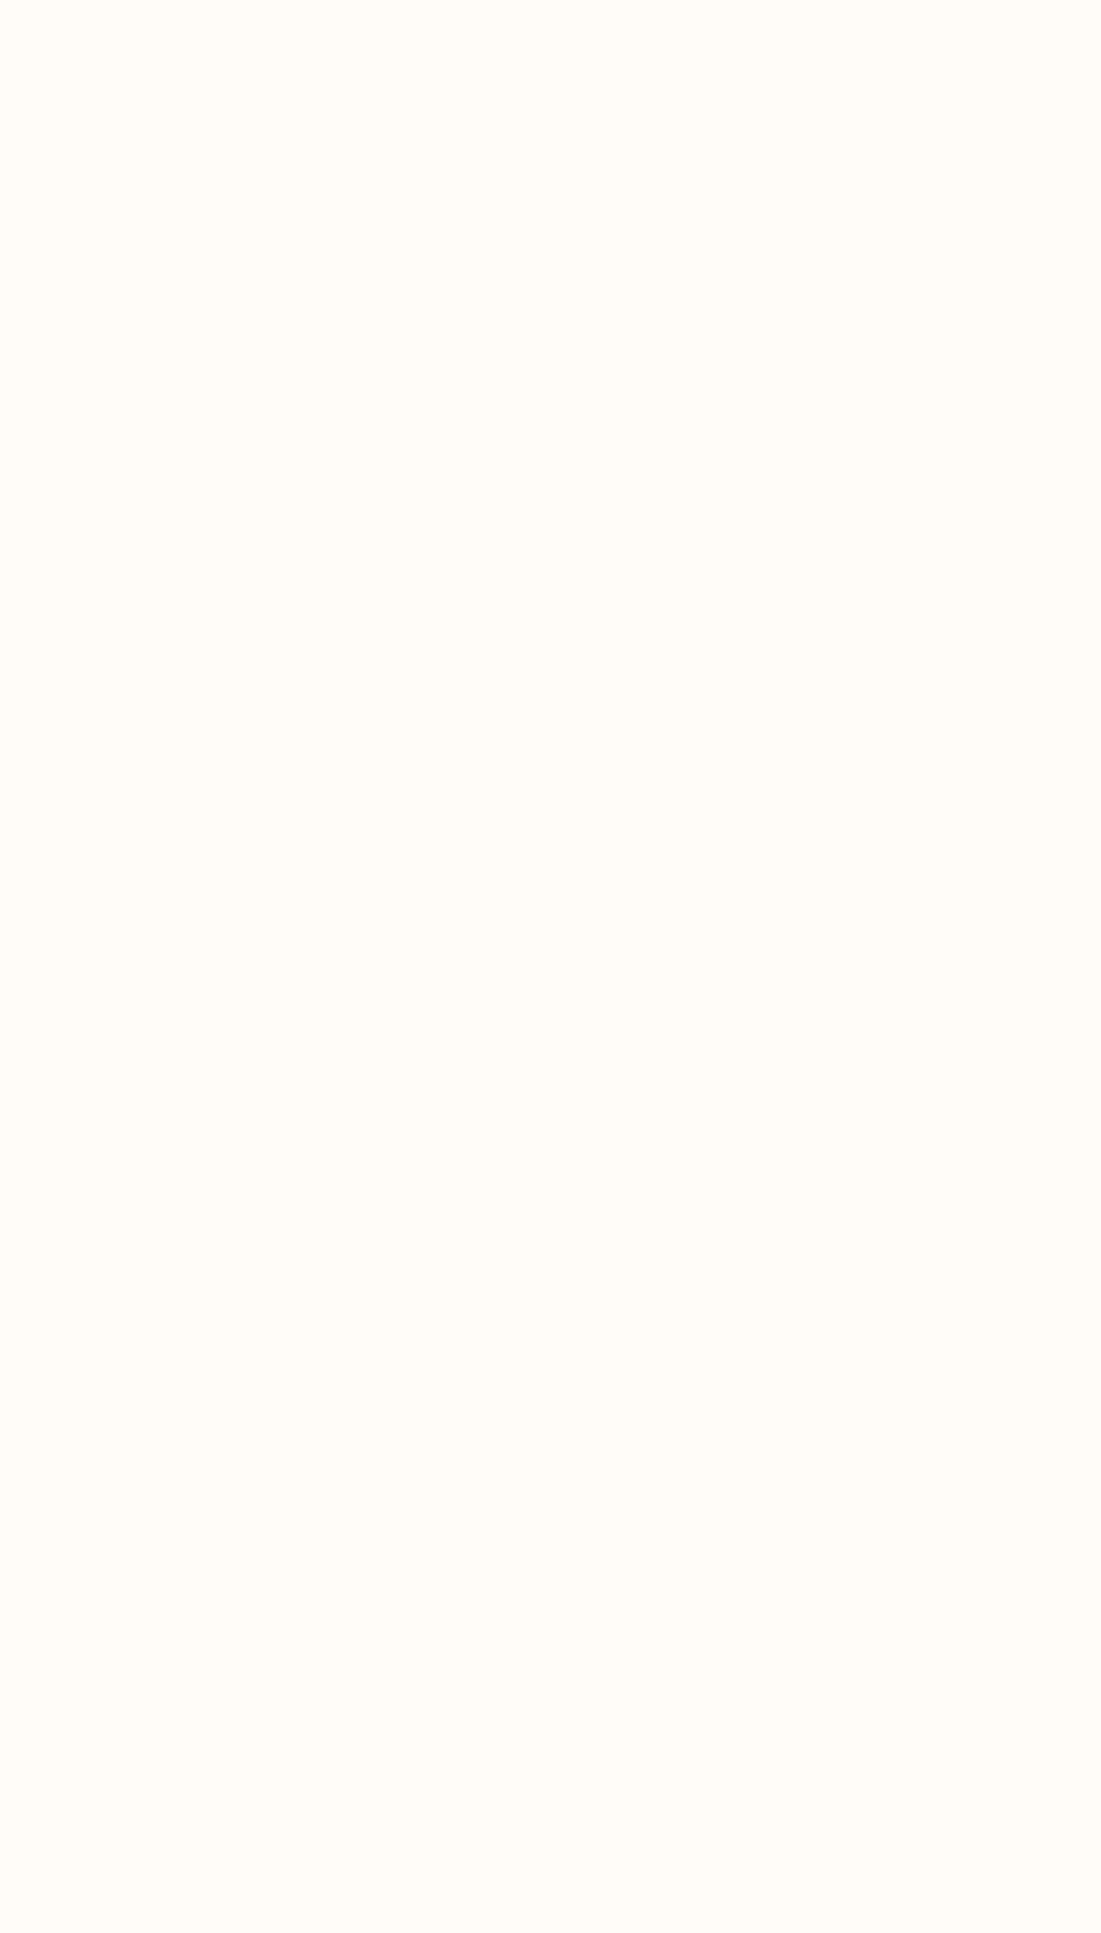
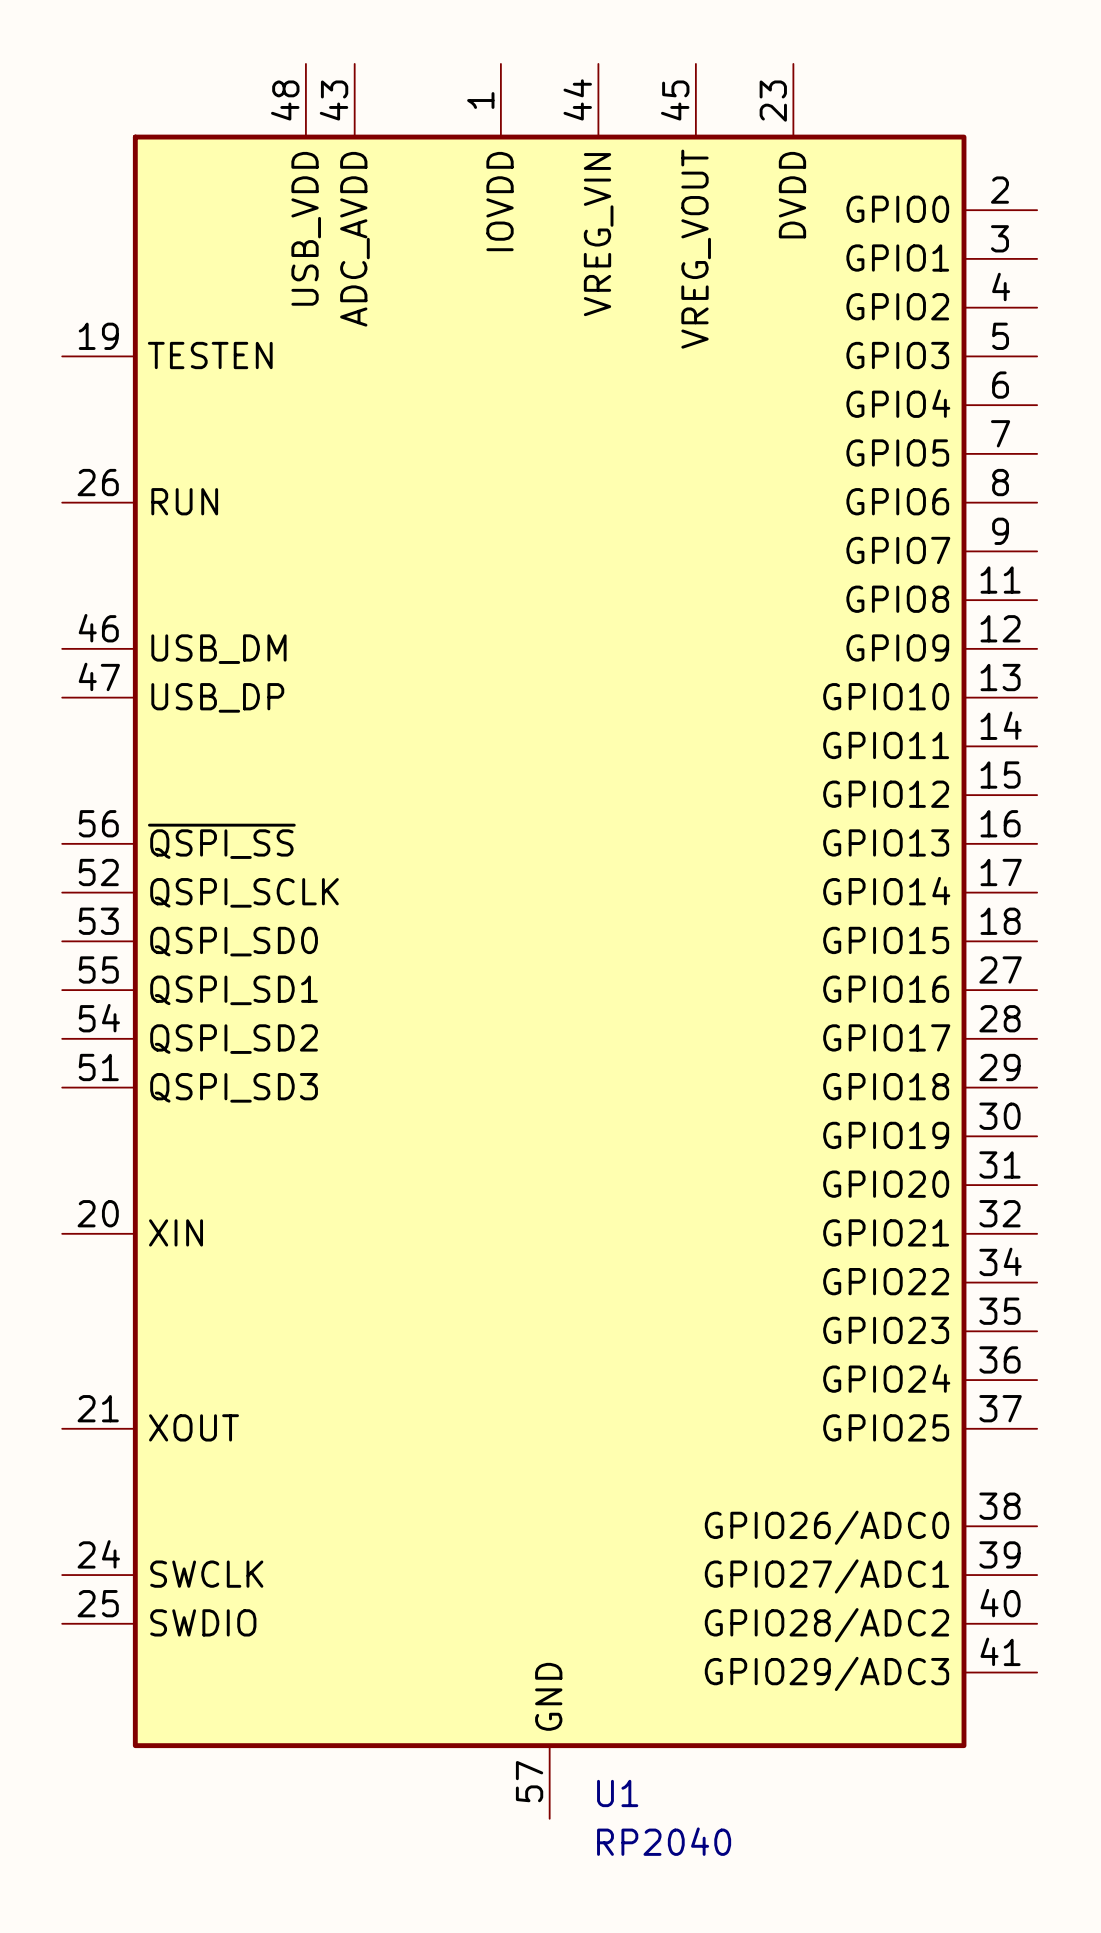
U1: none -> RP2040 (549, 941)

